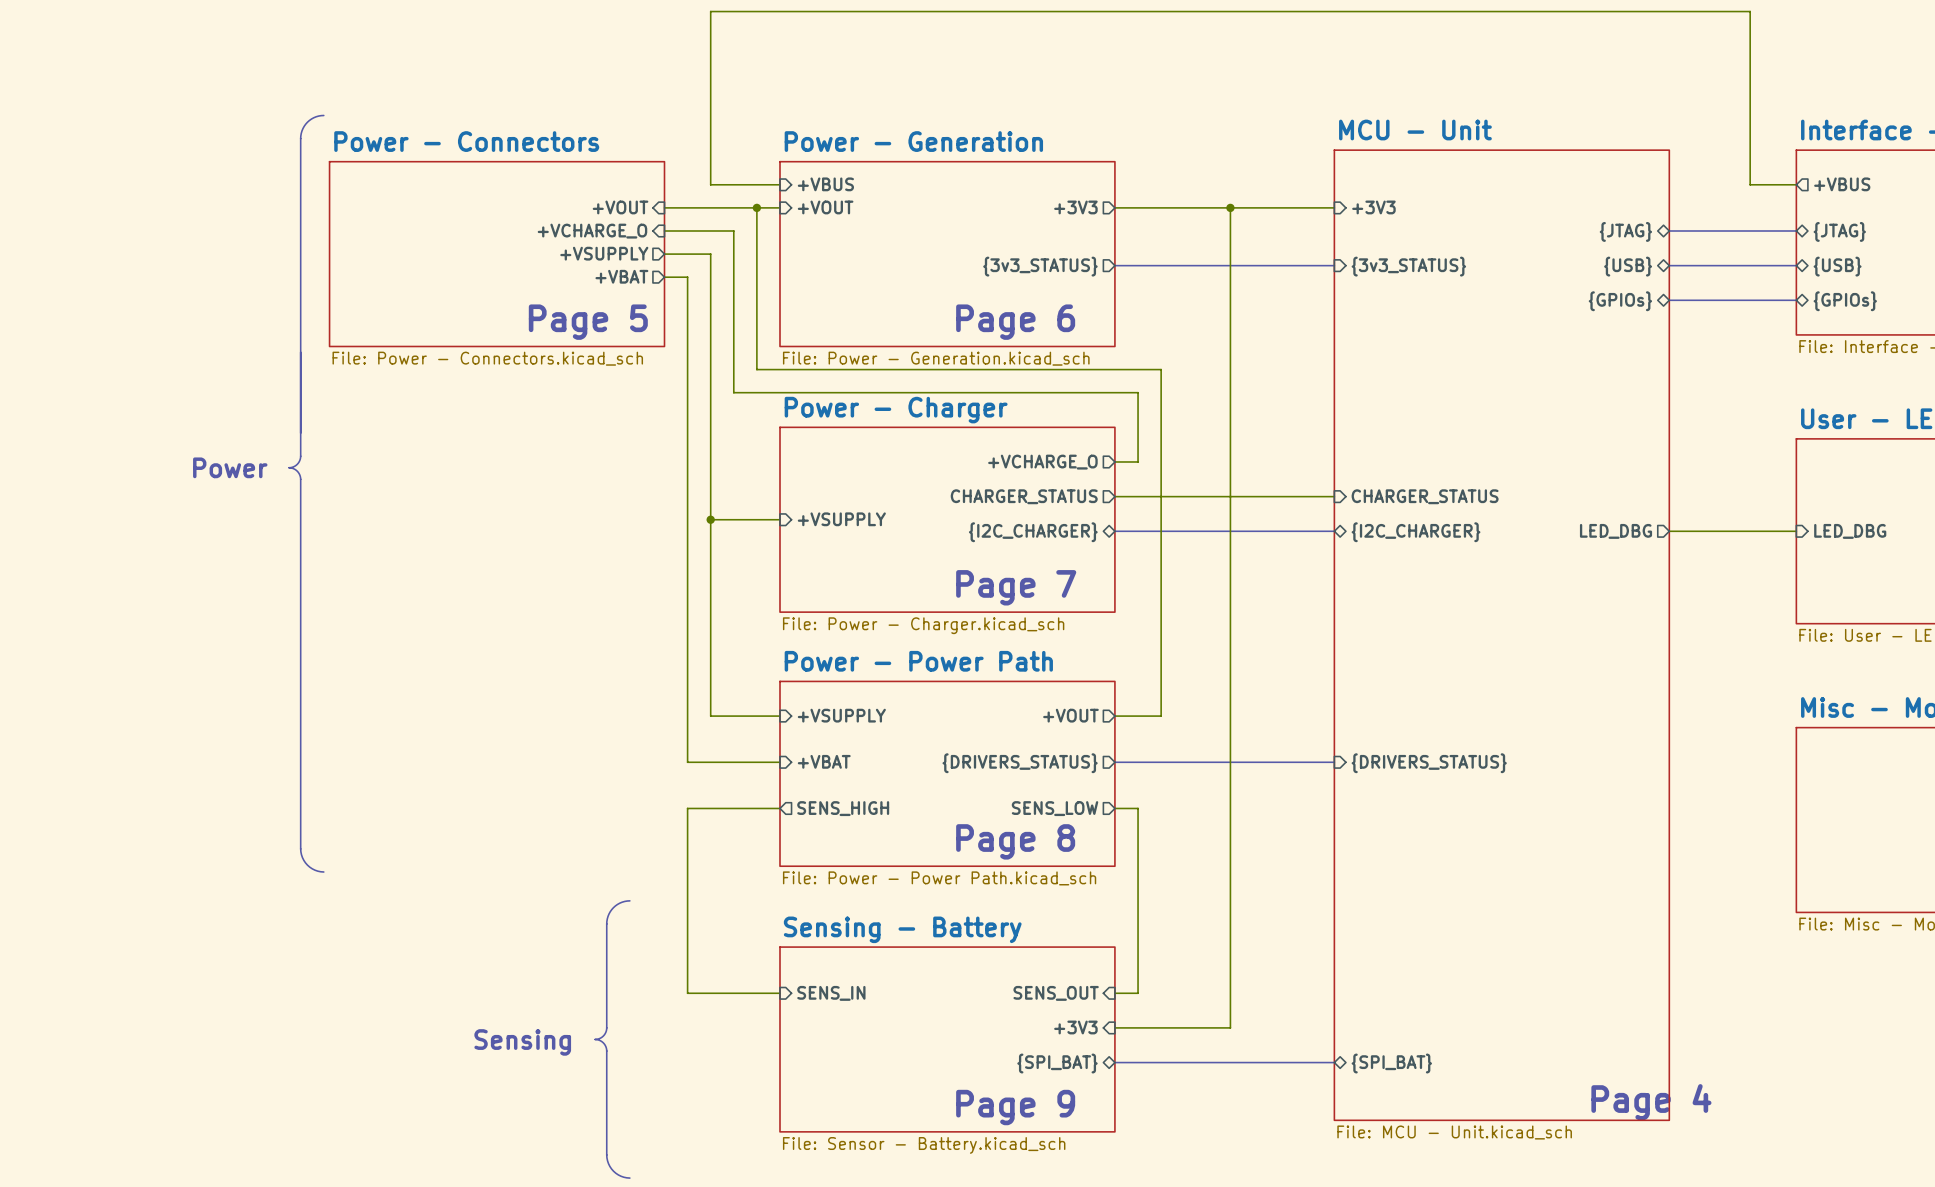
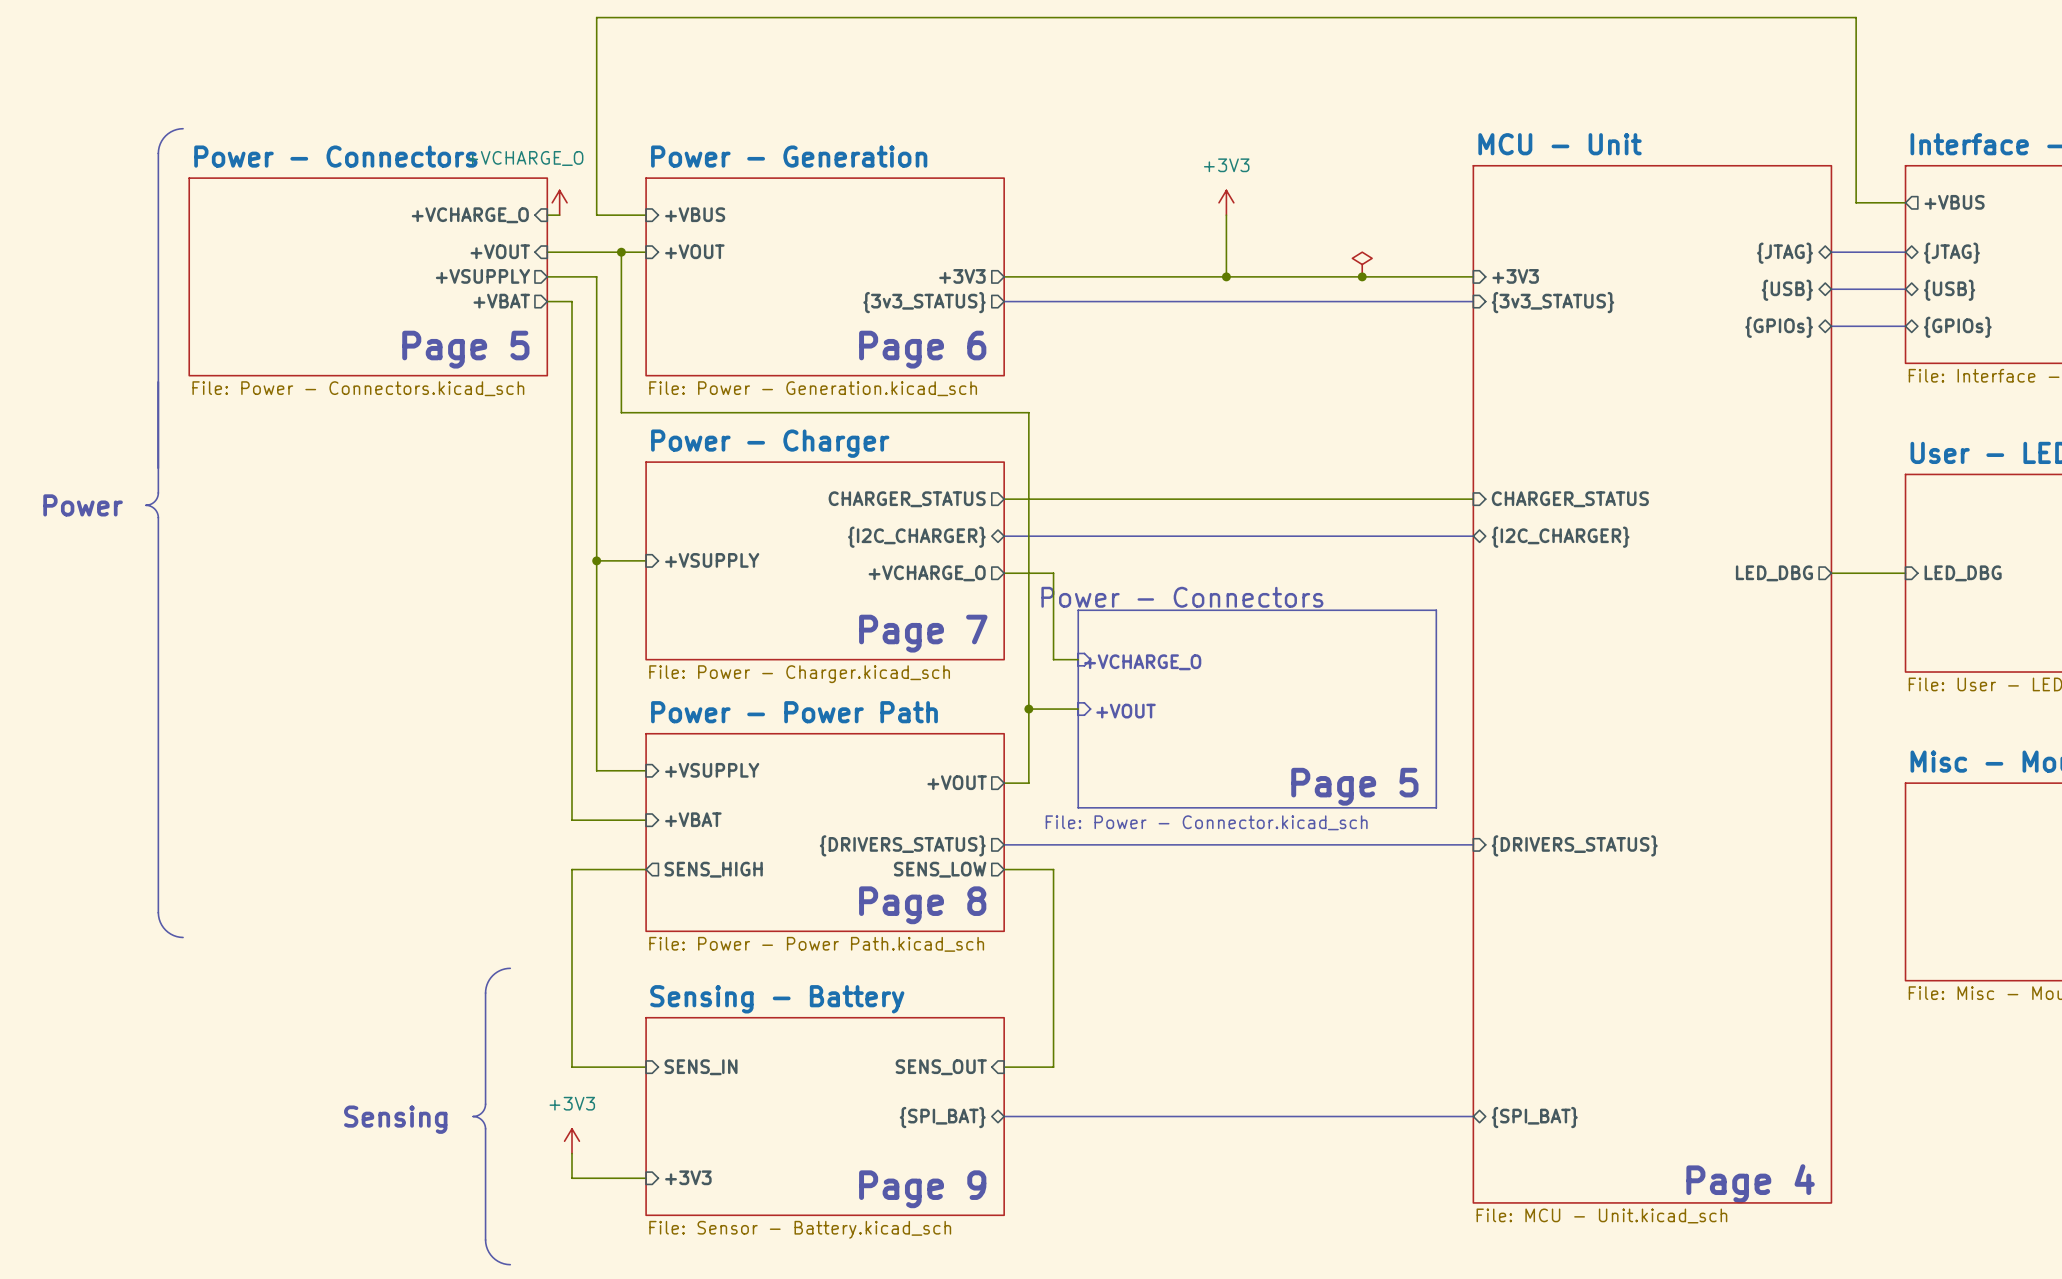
wire: (710, 11) (710, 184) (779, 184) -> (744, 17) (596, 17) (596, 215) (646, 215)
line: none -> (183, 128) (173, 130) (165, 135) (158, 150) (158, 492) (154, 501) (146, 505) (154, 508) (158, 517) (158, 915) (165, 930) (173, 935) (183, 937)
line: (323, 115) (309, 120) (304, 126) (300, 136) (300, 456) (297, 464) (289, 467) (297, 471) (300, 479) (300, 851) (307, 865) (314, 870) (323, 872) -> none
power symbol: none -> +VCHARGE_O (559, 202)
sheet pin position: +VBUS (825, 184) -> +VBUS (695, 214)
power symbol: none -> +3V3 (1226, 202)
wire: none -> (547, 215) (559, 215)
wire: none -> (1226, 215) (1226, 276)
sheet pin rotation: 0° (620, 207) -> 180° (694, 251)
wire: (664, 207) (779, 207) -> none
wire: (756, 207) (756, 369) (1161, 369) (1161, 716) (1114, 716) -> none
junction: (756, 207) -> none
sheet pin: +VOUT (825, 207) -> none
sheet pin: +3V3 (1075, 207) -> none
wire: (1114, 207) (1334, 207) -> none
wire: (1230, 207) (1230, 1027) (1114, 1027) -> none
junction: (1230, 207) -> none
sheet pin position: +3V3 (1373, 207) -> +3V3 (1515, 276)
sheet pin: none -> +VOUT (500, 251)
wire: none -> (547, 252) (646, 252)
wire: none -> (621, 252) (621, 412) (1028, 412) (1028, 783) (1004, 783)
junction: none -> (621, 252)
wire: (664, 230) (733, 230) (733, 392) (1138, 392) (1138, 461) -> (1473, 499) (1201, 499)
bus: (1669, 230) (1727, 230) -> none
sheet pin position: +VCHARGE_O (592, 231) -> +VCHARGE_O (470, 215)
sheet pin position: {JTAG} (1625, 231) -> {JTAG} (1785, 253)
power symbol: none -> (1362, 264)
sheet pin: none -> +VSUPPLY (482, 276)
sheet pin: +VSUPPLY (604, 253) -> none
sheet pin: none -> +3V3 (962, 276)
sheet Power - Connectors position: (497, 254) -> (368, 276)
wire: none -> (547, 276) (596, 276) (596, 770) (646, 770)
wire: (664, 254) (710, 254) (710, 716) (779, 716) -> none
sheet Power - Generation position: (947, 254) -> (825, 276)
wire: none -> (1004, 276) (1473, 276)
junction: none -> (1226, 276)
junction: none -> (1362, 276)
bus: (1114, 265) (1334, 265) -> none
bus: (1669, 265) (1727, 265) -> none
sheet pin: {3v3_STATUS} (1040, 266) -> none
sheet pin position: {3v3_STATUS} (1408, 266) -> {3v3_STATUS} (1552, 302)
sheet pin position: {USB} (1628, 266) -> {USB} (1787, 290)
sheet pin position: +VBAT (621, 276) -> +VBAT (501, 301)
wire: none -> (547, 301) (571, 301) (571, 820) (646, 820)
wire: (664, 277) (687, 277) (687, 762) (779, 762) -> none
bus: none -> (1004, 301) (1473, 301)
sheet pin: none -> {3v3_STATUS} (924, 302)
bus: (1669, 300) (1727, 300) -> none
sheet pin position: {GPIOs} (1620, 301) -> {GPIOs} (1779, 327)
text position: Page 5 (588, 322) -> Page 5 (465, 349)
text position: Page 6 (1015, 322) -> Page 6 (922, 349)
wire: none -> (1004, 499) (1177, 499)
sheet pin: none -> CHARGER_STATUS (907, 499)
sheet pin position: +VCHARGE_O (1042, 462) -> +VCHARGE_O (927, 573)
text position: Power (230, 467) -> Power (83, 505)
bus: none -> (1004, 536) (1473, 536)
sheet pin: CHARGER_STATUS (1024, 496) -> none
sheet pin position: CHARGER_STATUS (1425, 496) -> CHARGER_STATUS (1570, 499)
sheet pin: none -> {I2C_CHARGER} (916, 537)
wire: none -> (596, 560) (646, 560)
junction: none -> (596, 560)
sheet pin: none -> +VSUPPLY (712, 560)
wire: (710, 519) (779, 519) -> none
junction: (710, 519) -> none
sheet pin: +VSUPPLY (841, 519) -> none
sheet Power - Charger position: (947, 519) -> (825, 560)
wire: none -> (1004, 573) (1053, 573) (1053, 659) (1078, 659)
bus: (1114, 531) (1334, 531) -> none
sheet pin position: LED_DBG (1616, 531) -> LED_DBG (1774, 573)
wire: (1669, 531) (1727, 531) -> none
sheet pin: {I2C_CHARGER} (1033, 532) -> none
sheet pin position: {I2C_CHARGER} (1416, 532) -> {I2C_CHARGER} (1560, 537)
text: none -> Power - Connectors (1182, 597)
line: none -> (1078, 610) (1078, 807) (1436, 807) (1436, 610) (1078, 610)
text position: Page 7 (1016, 587) -> Page 7 (923, 633)
line: none -> (1078, 653) (1084, 653) (1090, 659) (1084, 665) (1078, 665)
text: none -> +VCHARGE_O (1142, 662)
sheet MCU - Unit position: (1501, 635) -> (1652, 684)
line: none -> (1078, 702) (1084, 702) (1090, 709) (1084, 715) (1078, 715)
wire: none -> (1028, 709) (1078, 709)
junction: none -> (1028, 709)
text: none -> +VOUT (1126, 711)
sheet pin: none -> +VSUPPLY (712, 770)
sheet pin: +VSUPPLY (841, 715) -> none
sheet pin position: +VOUT (1070, 715) -> +VOUT (957, 782)
text: none -> Page 5 (1354, 786)
sheet pin position: +VBAT (824, 761) -> +VBAT (693, 819)
bus: (1114, 762) (1334, 762) -> none
sheet pin position: {DRIVERS_STATUS} (1020, 763) -> {DRIVERS_STATUS} (902, 845)
sheet pin position: {DRIVERS_STATUS} (1429, 763) -> {DRIVERS_STATUS} (1574, 845)
text: none -> File: Power - Connector.kicad_sch (1206, 822)
sheet Power - Power Path position: (947, 773) -> (825, 832)
bus: none -> (1004, 844) (1473, 844)
wire: none -> (646, 869) (571, 869) (571, 1067) (646, 1067)
wire: (779, 808) (687, 808) (687, 993) (779, 993) -> none
sheet pin position: SENS_HIGH (843, 808) -> SENS_HIGH (713, 869)
wire: none -> (1004, 869) (1053, 869) (1053, 1067) (1004, 1067)
sheet pin position: SENS_LOW (1055, 808) -> SENS_LOW (940, 869)
wire: (1114, 808) (1138, 808) (1138, 993) (1114, 993) -> none
text position: Page 8 (1015, 841) -> Page 8 (922, 905)
line: (629, 900) (615, 905) (607, 918) (606, 1029) (603, 1036) (595, 1039) (603, 1042) (606, 1049) (607, 1160) (615, 1173) (629, 1178) -> (510, 968) (494, 973) (486, 987) (485, 1105) (480, 1113) (473, 1116) (480, 1119) (485, 1127) (486, 1246) (495, 1259) (510, 1264)
sheet pin position: SENS_IN (831, 993) -> SENS_IN (701, 1067)
sheet pin position: SENS_OUT (1056, 993) -> SENS_OUT (941, 1067)
sheet pin: +3V3 (1075, 1027) -> none
sheet Sensing - Battery position: (947, 1039) -> (825, 1116)
bus: none -> (1004, 1116) (1473, 1116)
sheet pin: none -> {SPI_BAT} (942, 1117)
text position: Sensing (522, 1042) -> Sensing (395, 1119)
power symbol: none -> +3V3 (571, 1141)
bus: (1114, 1062) (1334, 1062) -> none
sheet pin: {SPI_BAT} (1057, 1063) -> none
sheet pin position: {SPI_BAT} (1391, 1063) -> {SPI_BAT} (1534, 1117)
wire: none -> (571, 1153) (571, 1178) (646, 1178)
sheet pin: none -> +3V3 (688, 1177)
text position: Page 9 (1015, 1107) -> Page 9 (922, 1189)

